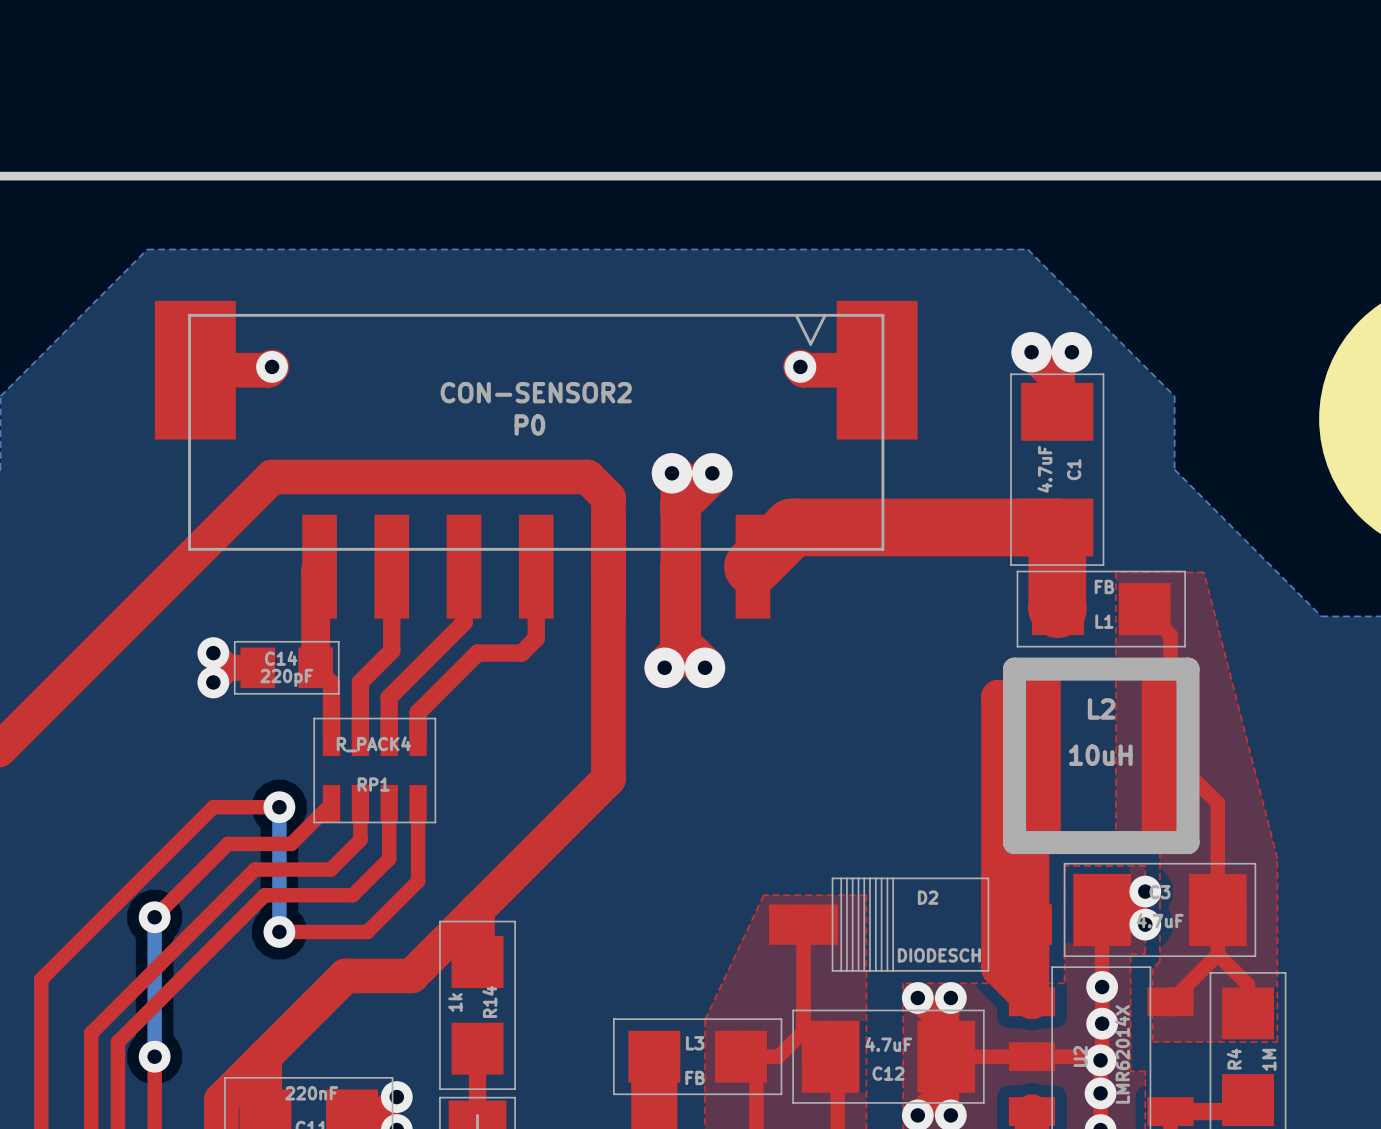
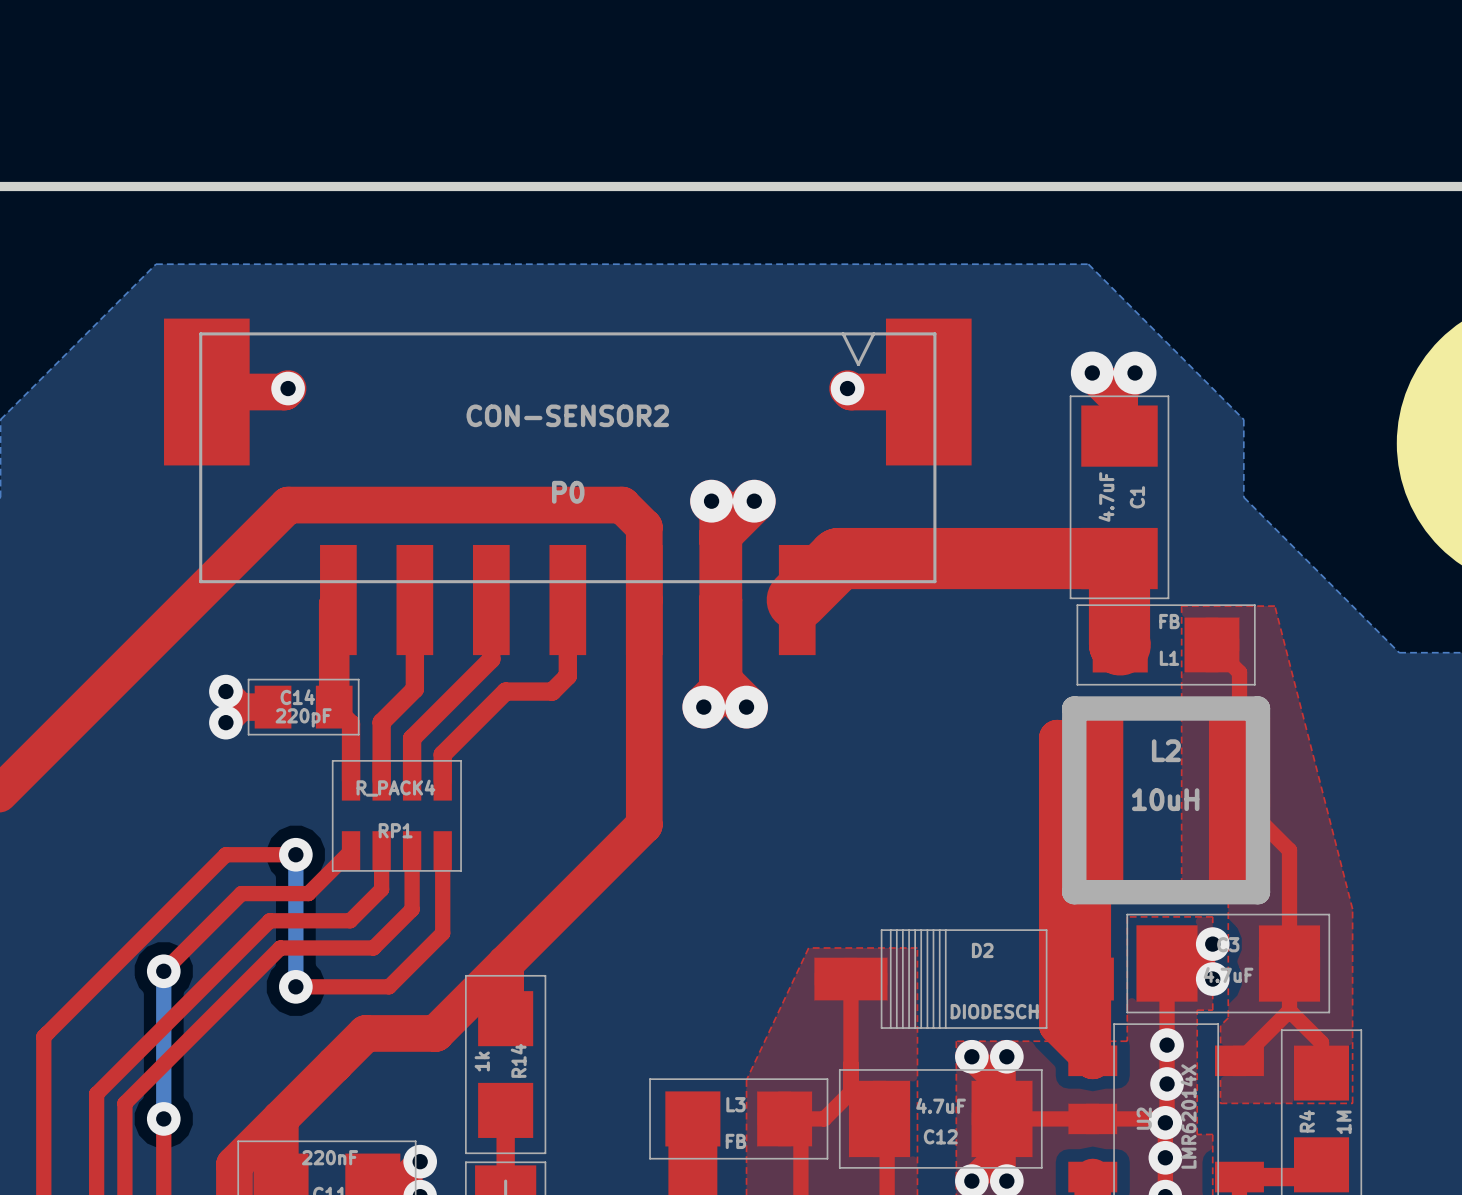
P0 name position: P0 (529, 424) -> P0 (568, 492)

